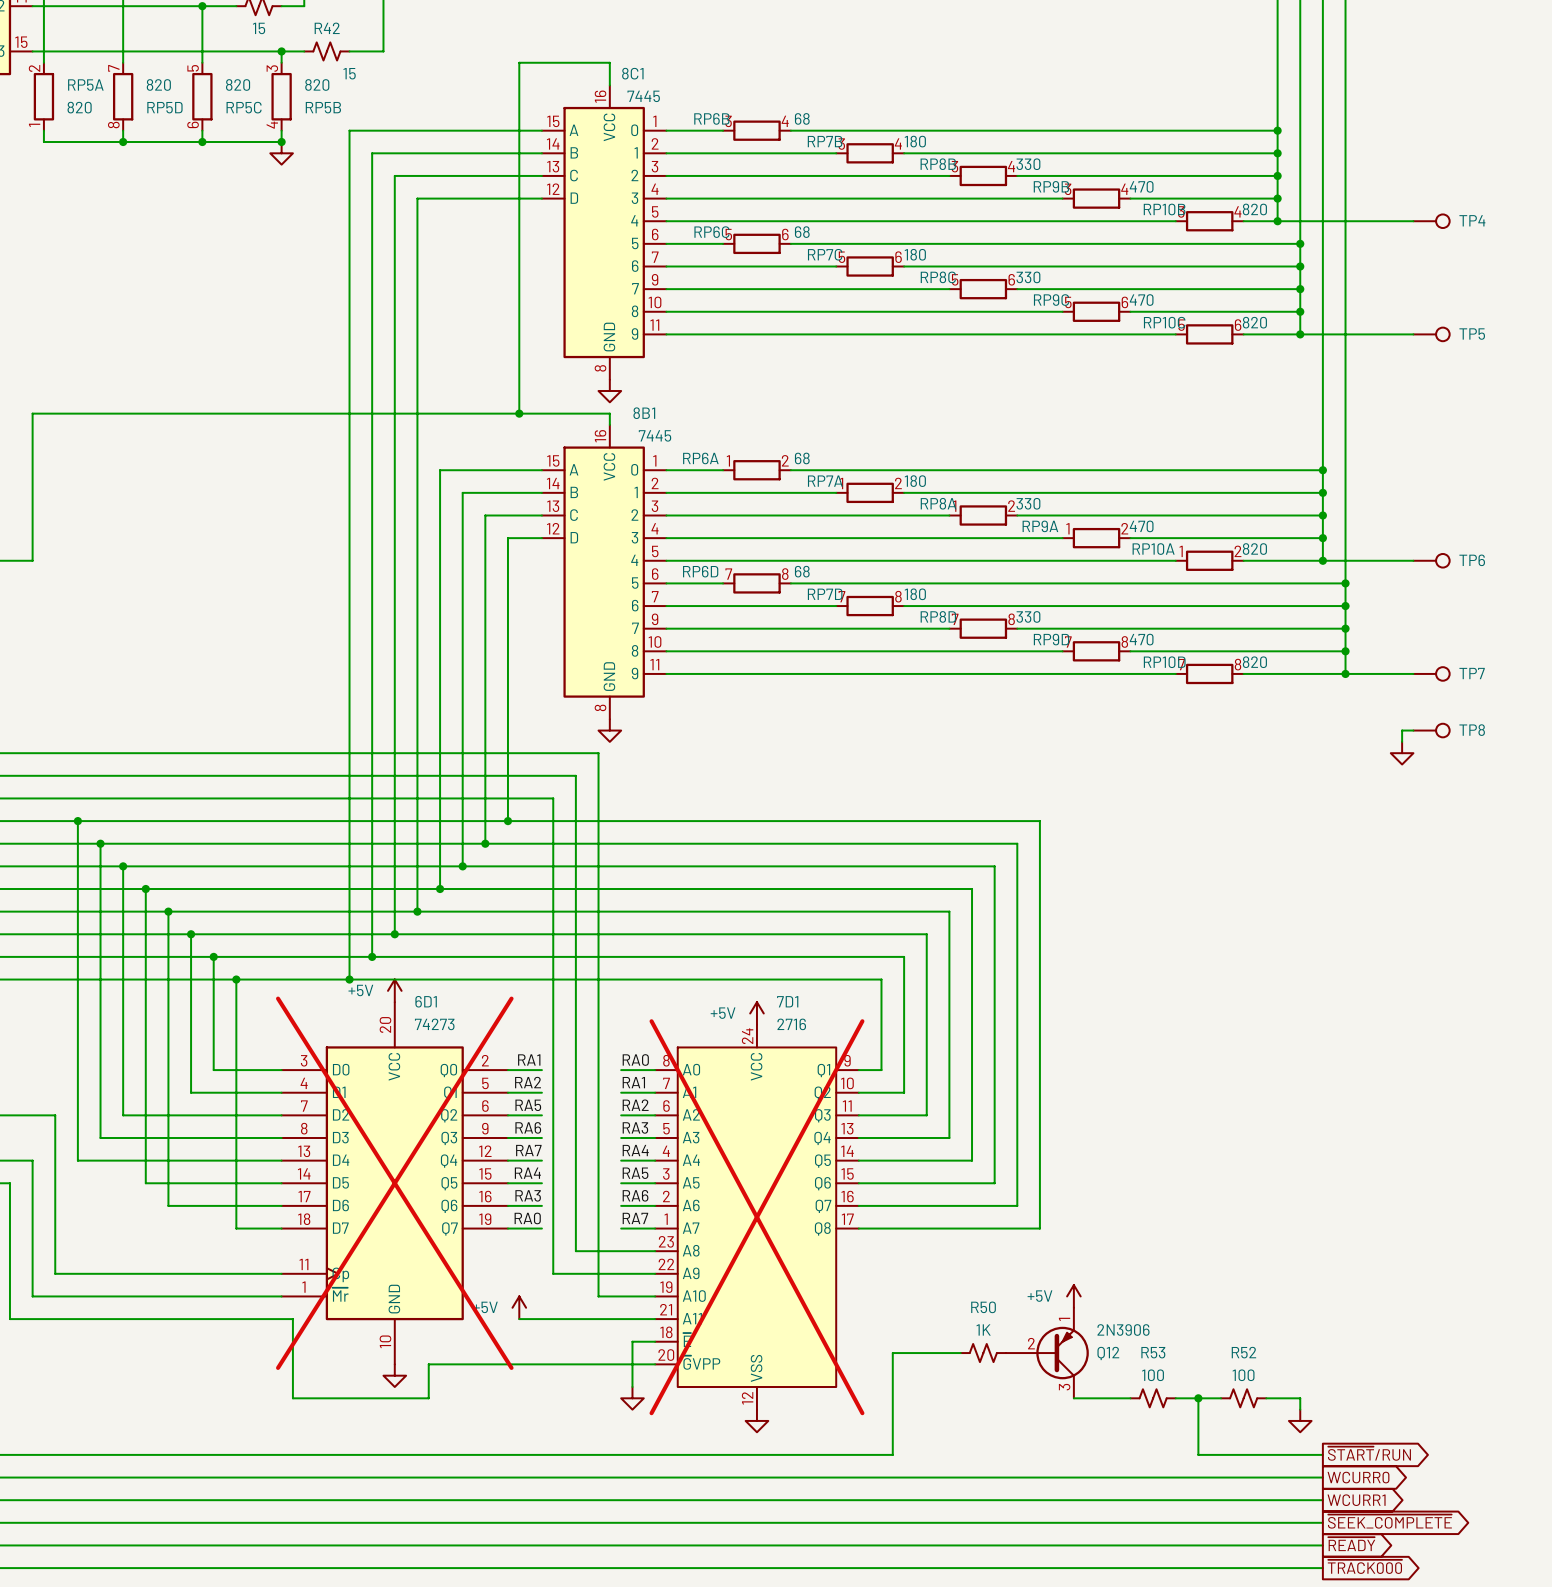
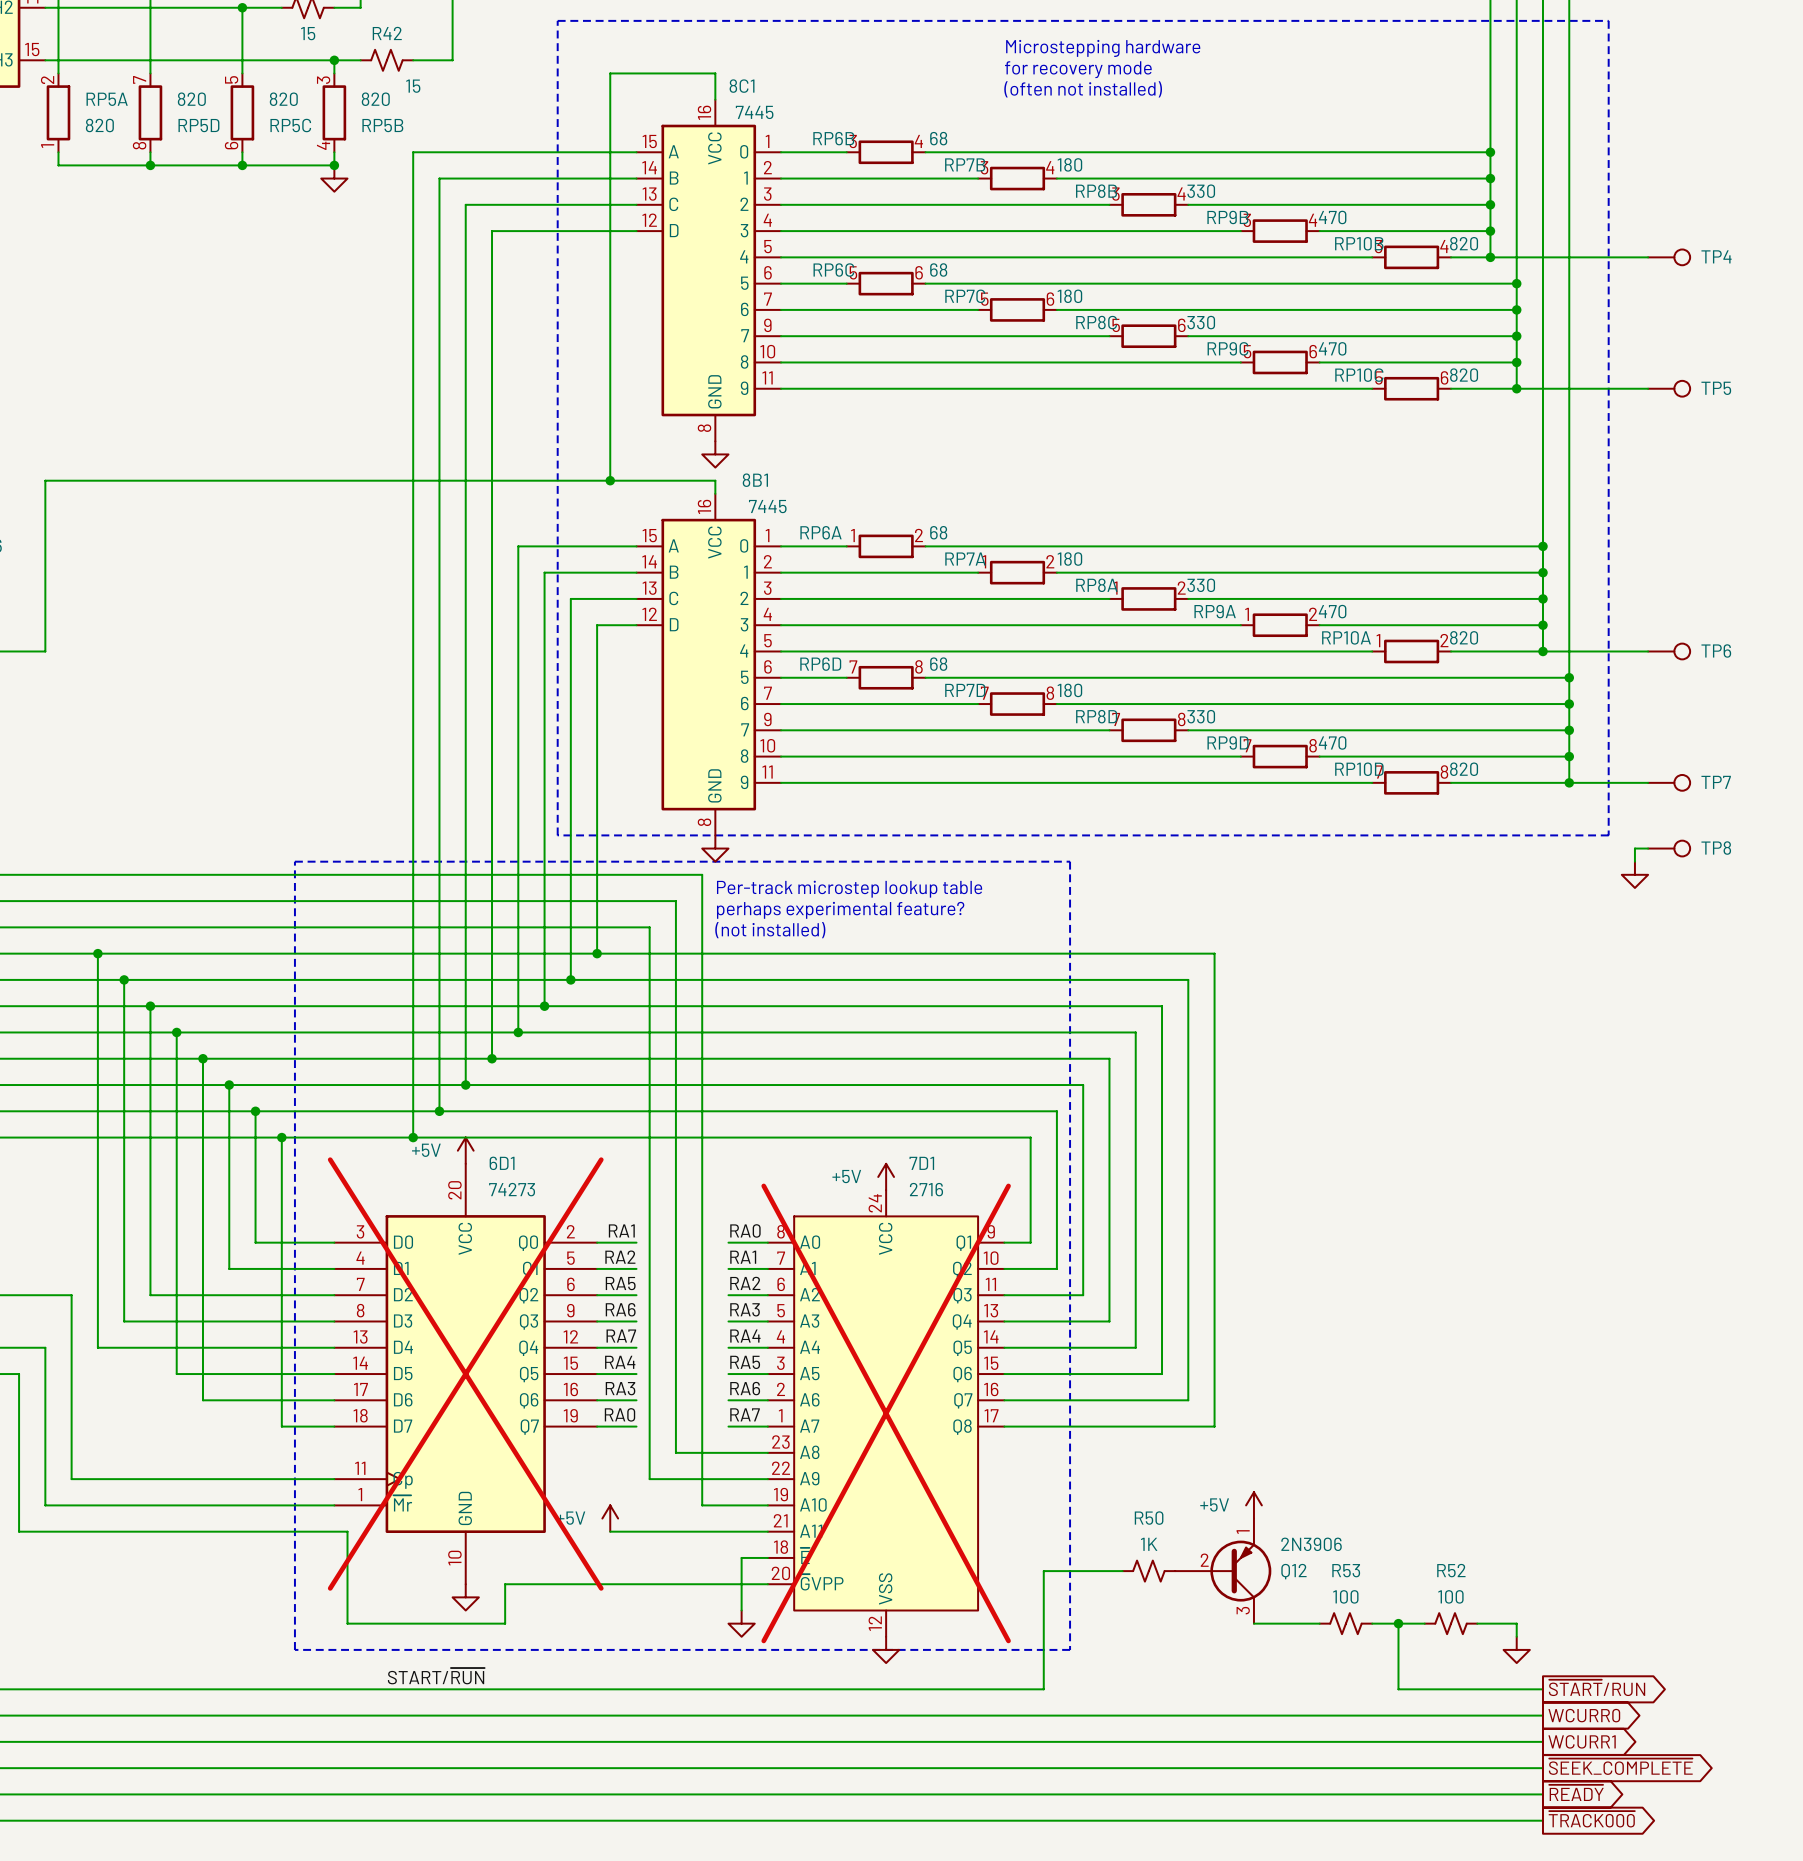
line: none -> (557, 20) (1608, 20) (1608, 835) (557, 835) (557, 20)
text: none -> Microstepping hardware (1103, 48)
text: none -> for recovery mode (1078, 69)
text: none -> (often not installed) (1083, 89)
line: none -> (294, 861) (1070, 861) (1070, 1649) (294, 1649) (294, 861)
text: none -> Per-track microstep lookup table (849, 889)
text: none -> perhaps experimental feature? (840, 910)
text: none -> (not installed) (770, 930)
label: none -> START/~{RUN} (436, 1676)

